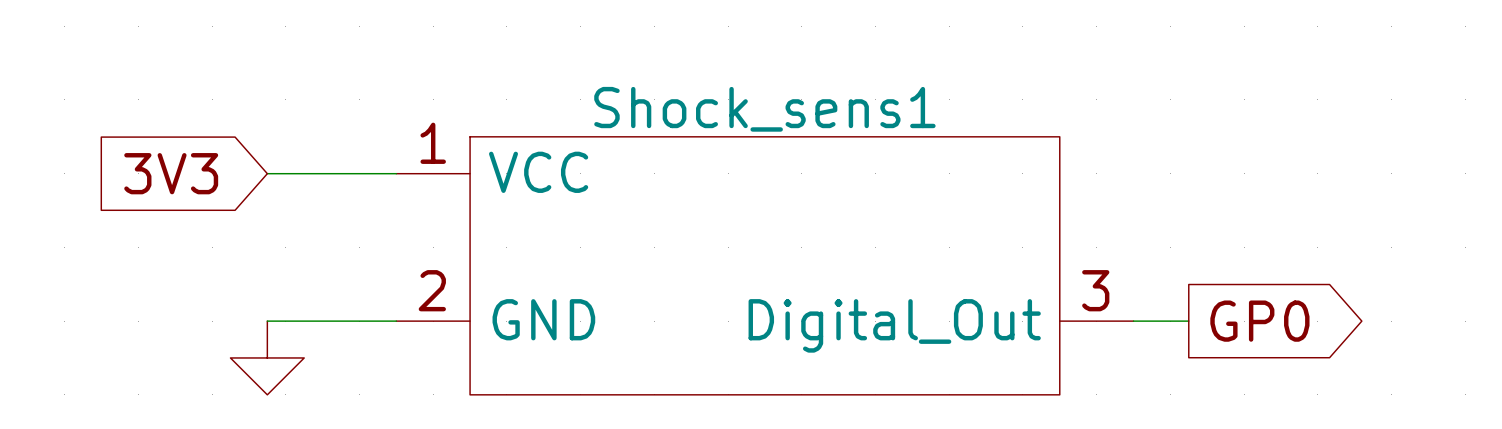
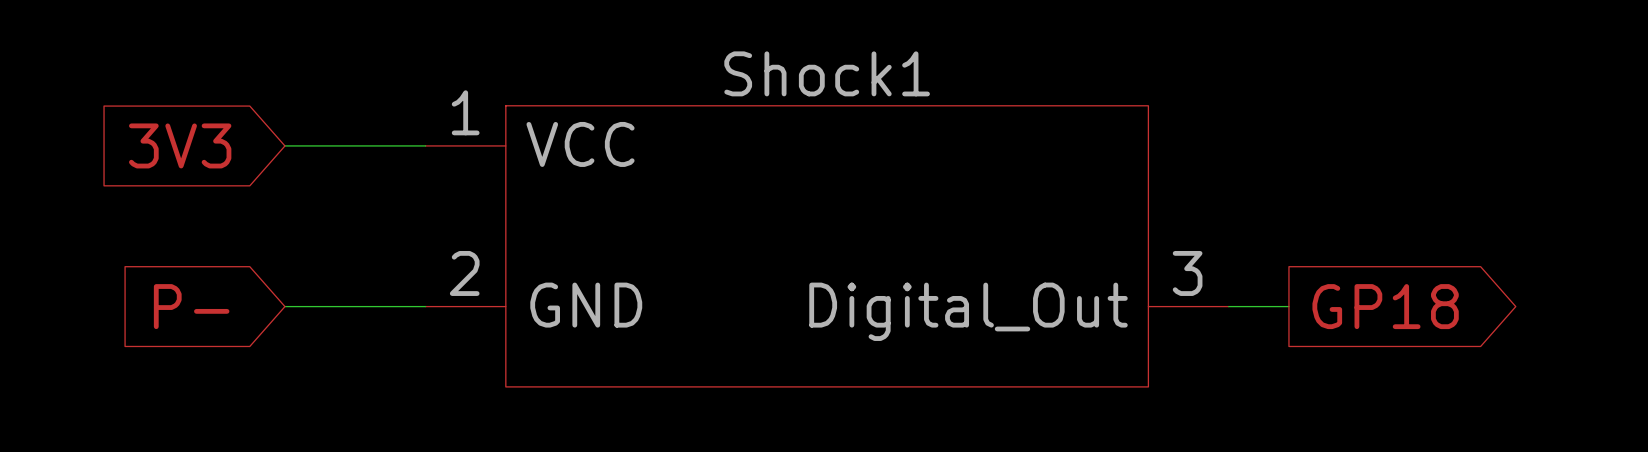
Shock_sens1 name: Shock_sens1 (764, 109) -> Shock1 (827, 73)
global label: none -> P- (191, 306)
global label: GP0 (1259, 321) -> GP18 (1385, 306)
power symbol: (267, 357) -> none

